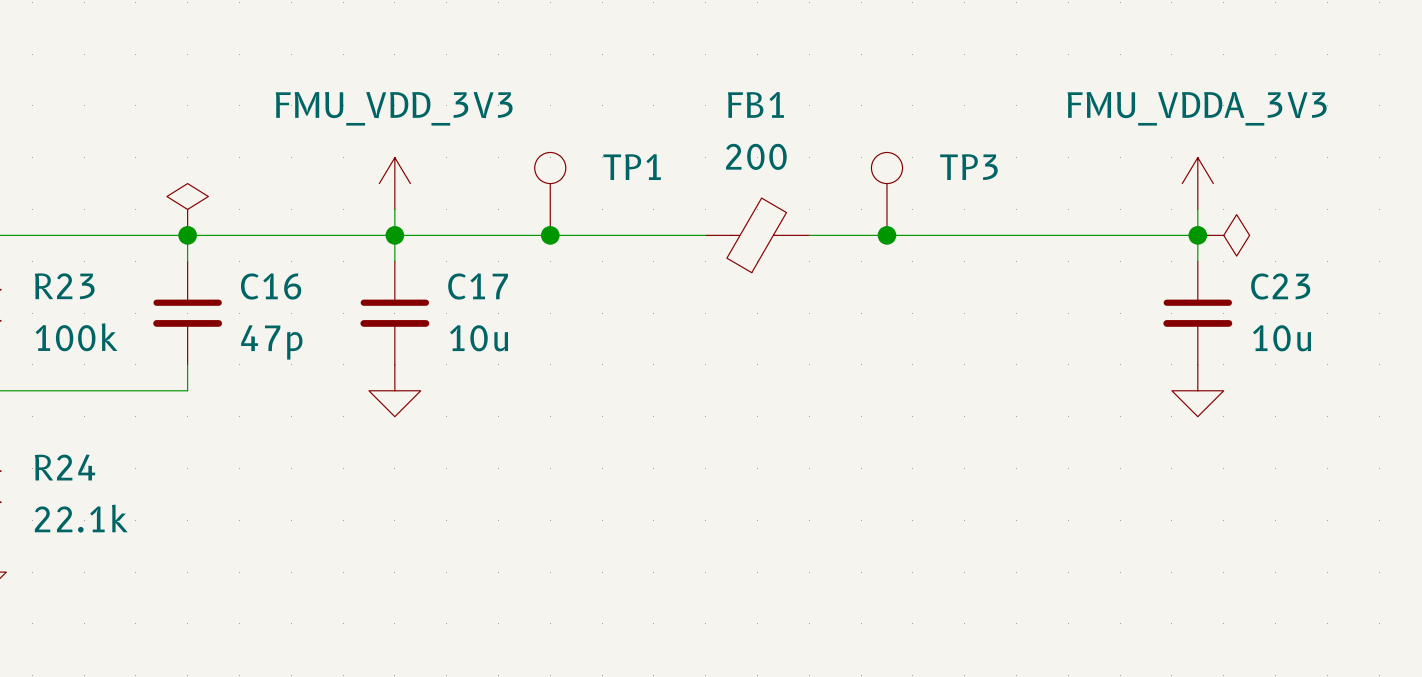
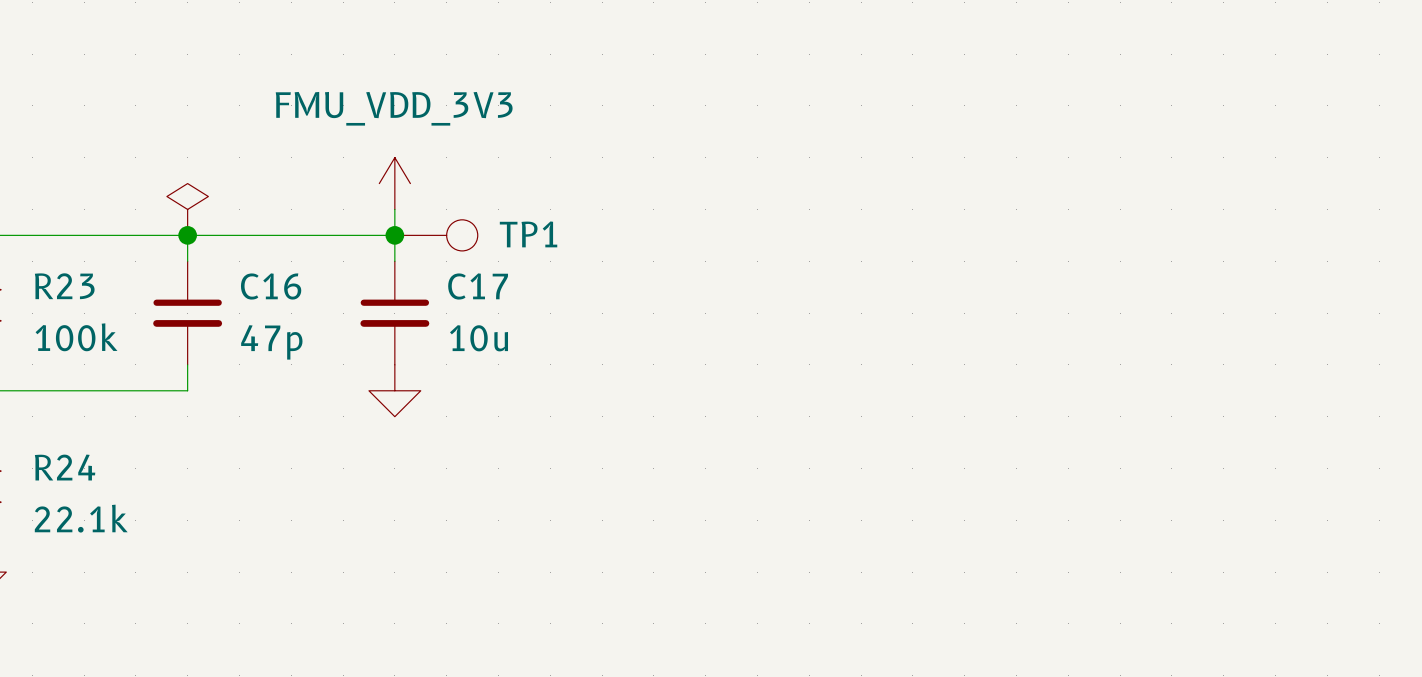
TP1 rotation: 0° (550, 168) -> 90° clockwise (462, 235)
power symbol: FMU_VDDA_3V3 (1197, 183) -> none
TP1 position: (550, 193) -> (436, 235)
TP3: (886, 193) -> none
wire: (1197, 209) (1197, 261) -> none
wire: (394, 235) (705, 235) -> none
junction: (550, 235) -> none
FB1: 200 (757, 235) -> none
wire: (809, 235) (1197, 235) -> none
junction: (886, 235) -> none
junction: (1197, 235) -> none
power symbol: (1223, 235) -> none
C23: 10u (1197, 313) -> none
power symbol: (1197, 390) -> none

